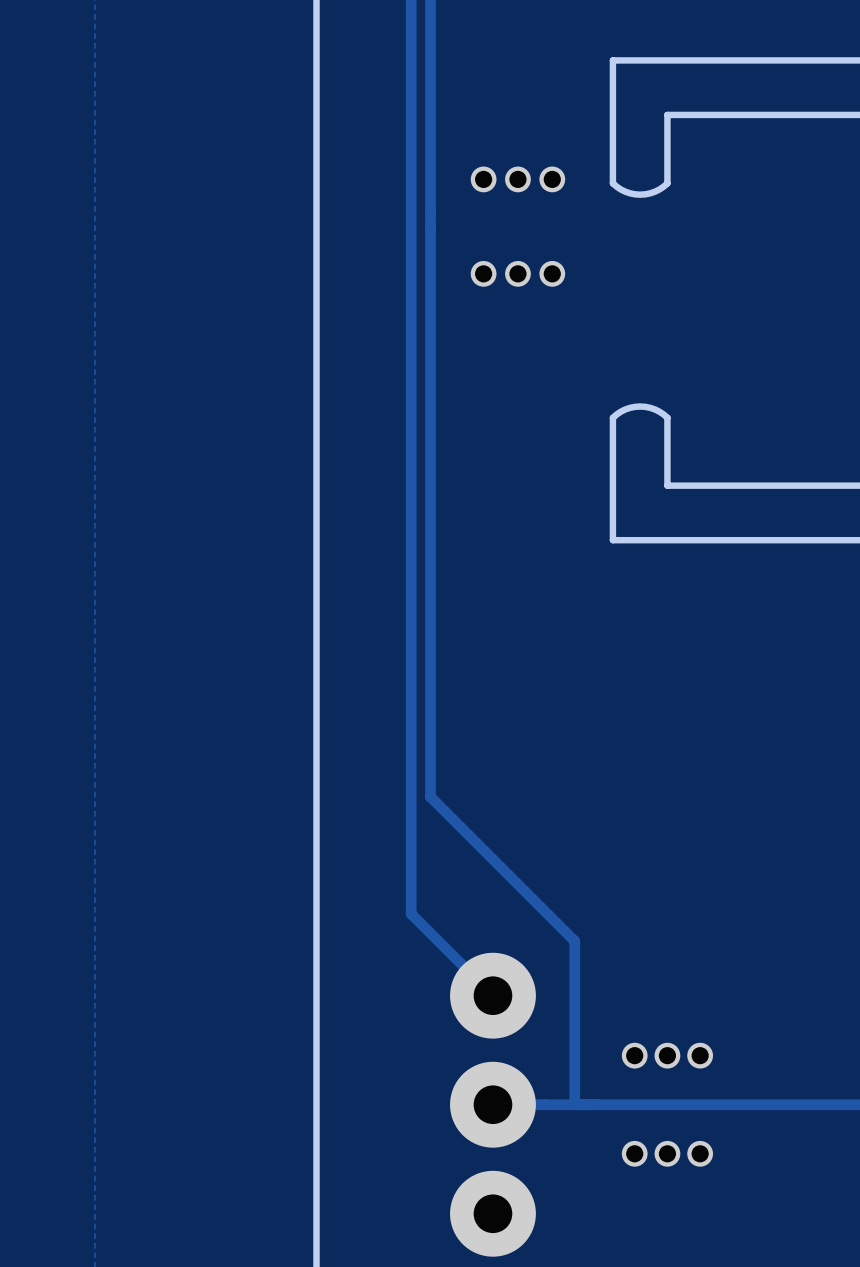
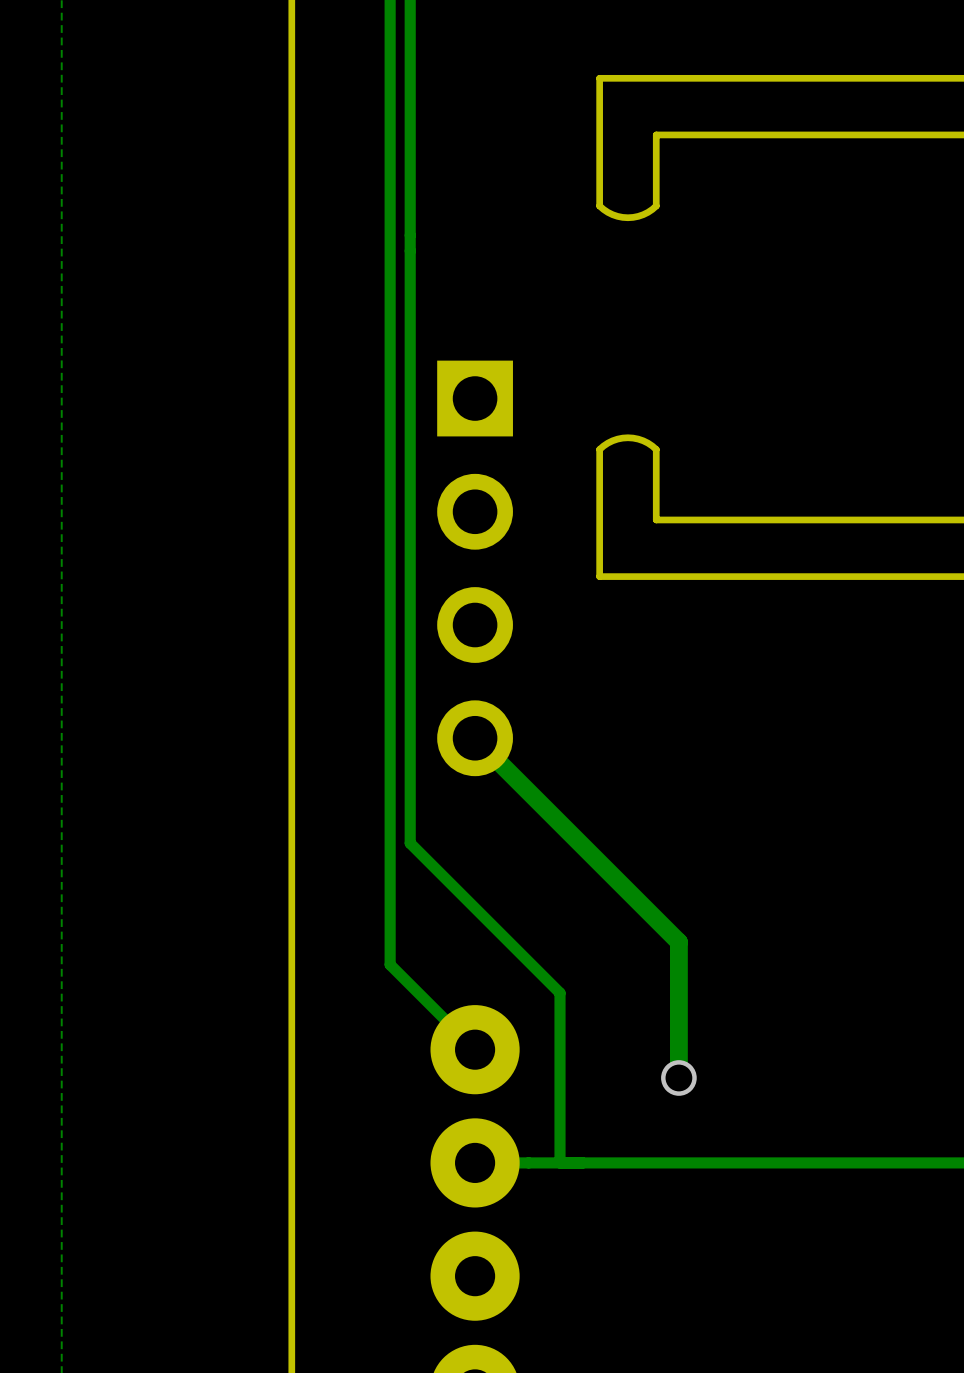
part: (483, 179) -> none
part: (517, 179) -> none
part: (552, 179) -> none
part: (483, 273) -> none
part: (517, 273) -> none
part: (552, 273) -> none
part: none -> (475, 568)
track: none -> (475, 738) (678, 942) (678, 1077)
via: none -> (678, 1077)
part: (634, 1055) -> none
part: (667, 1055) -> none
part: (700, 1055) -> none
part: (634, 1153) -> none
part: (667, 1153) -> none
part: (700, 1153) -> none

